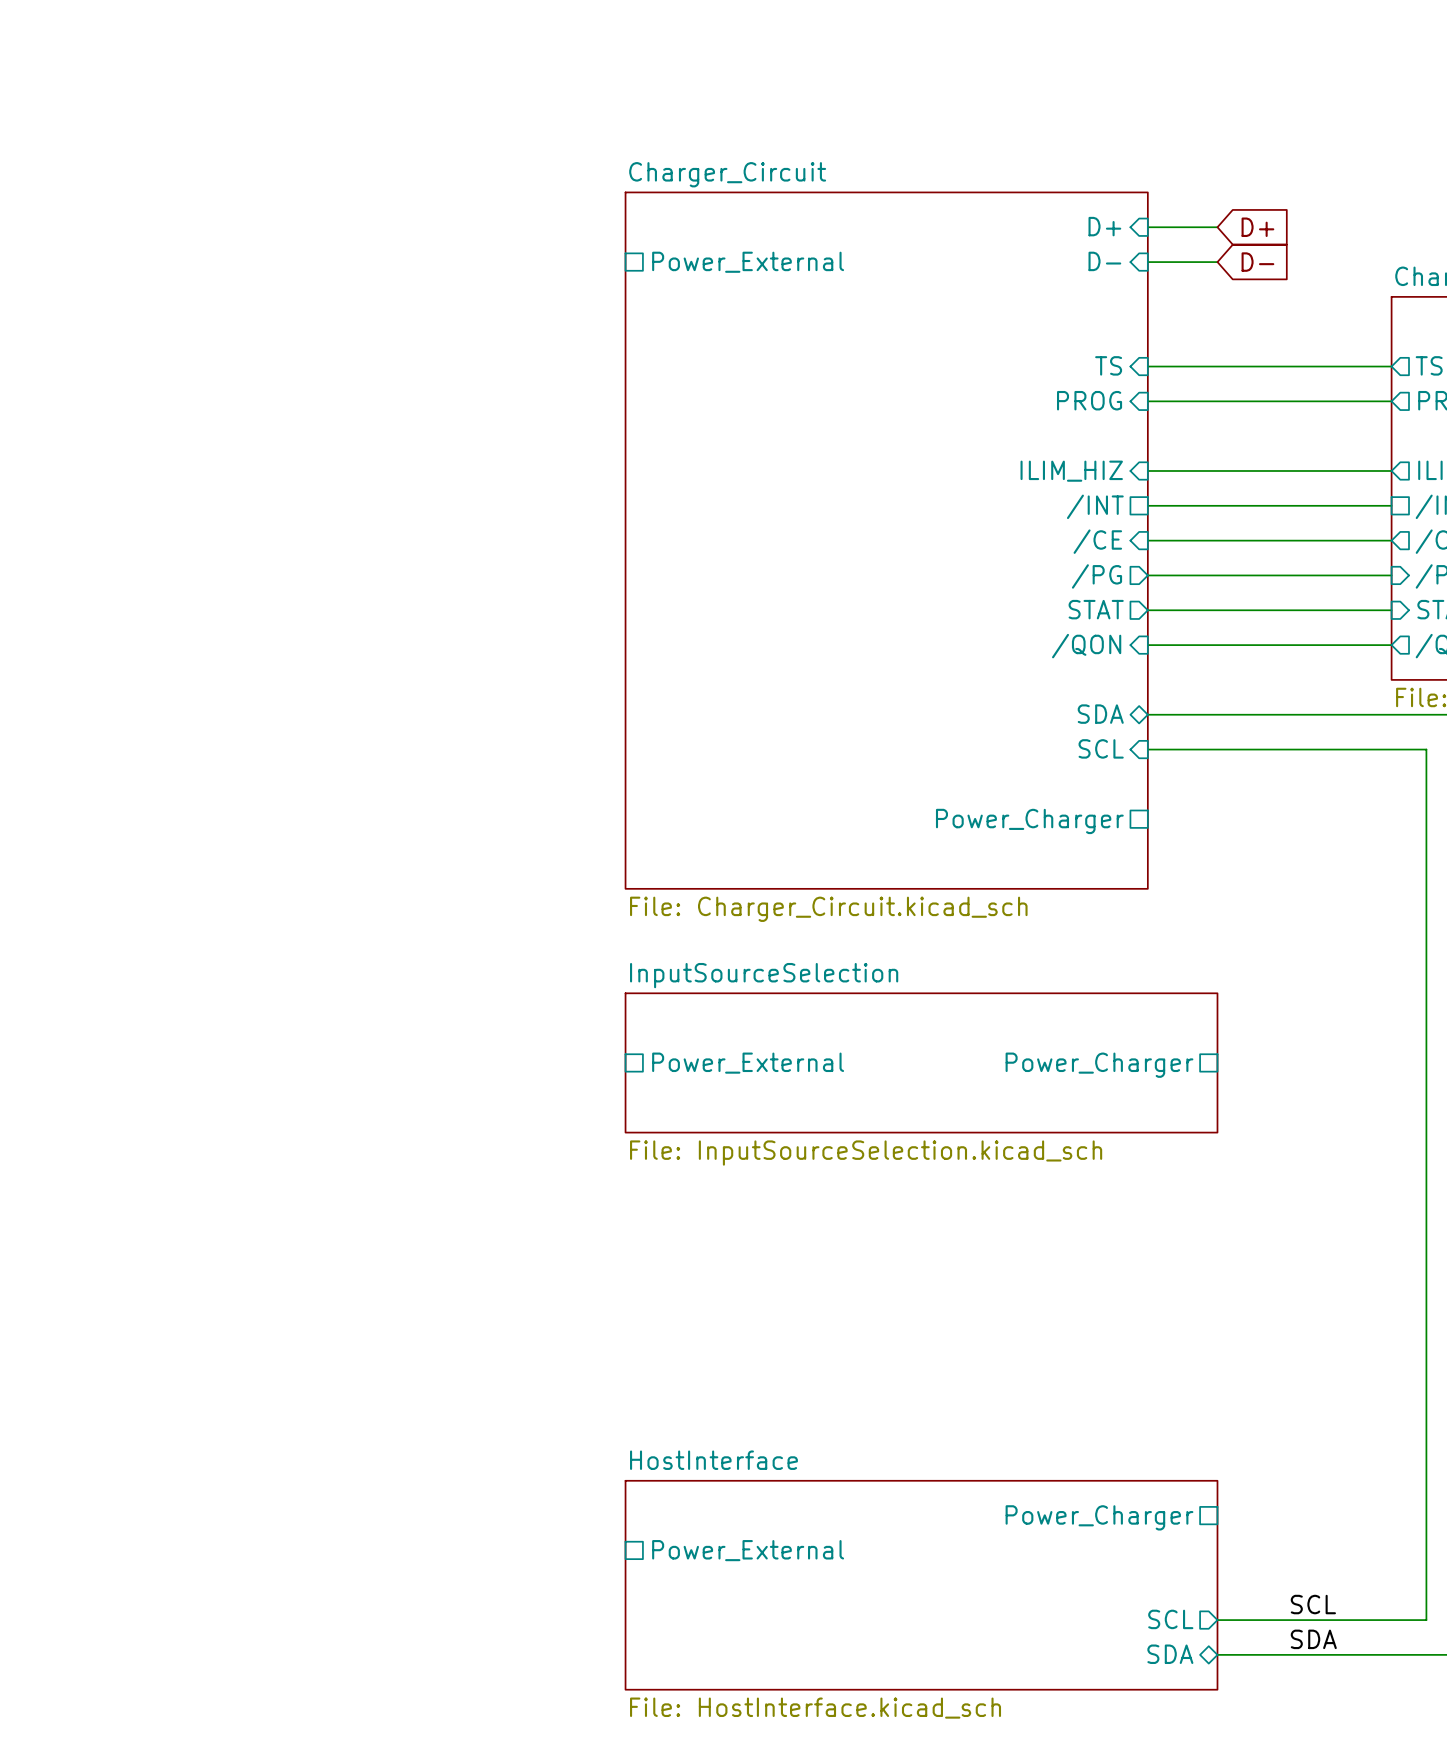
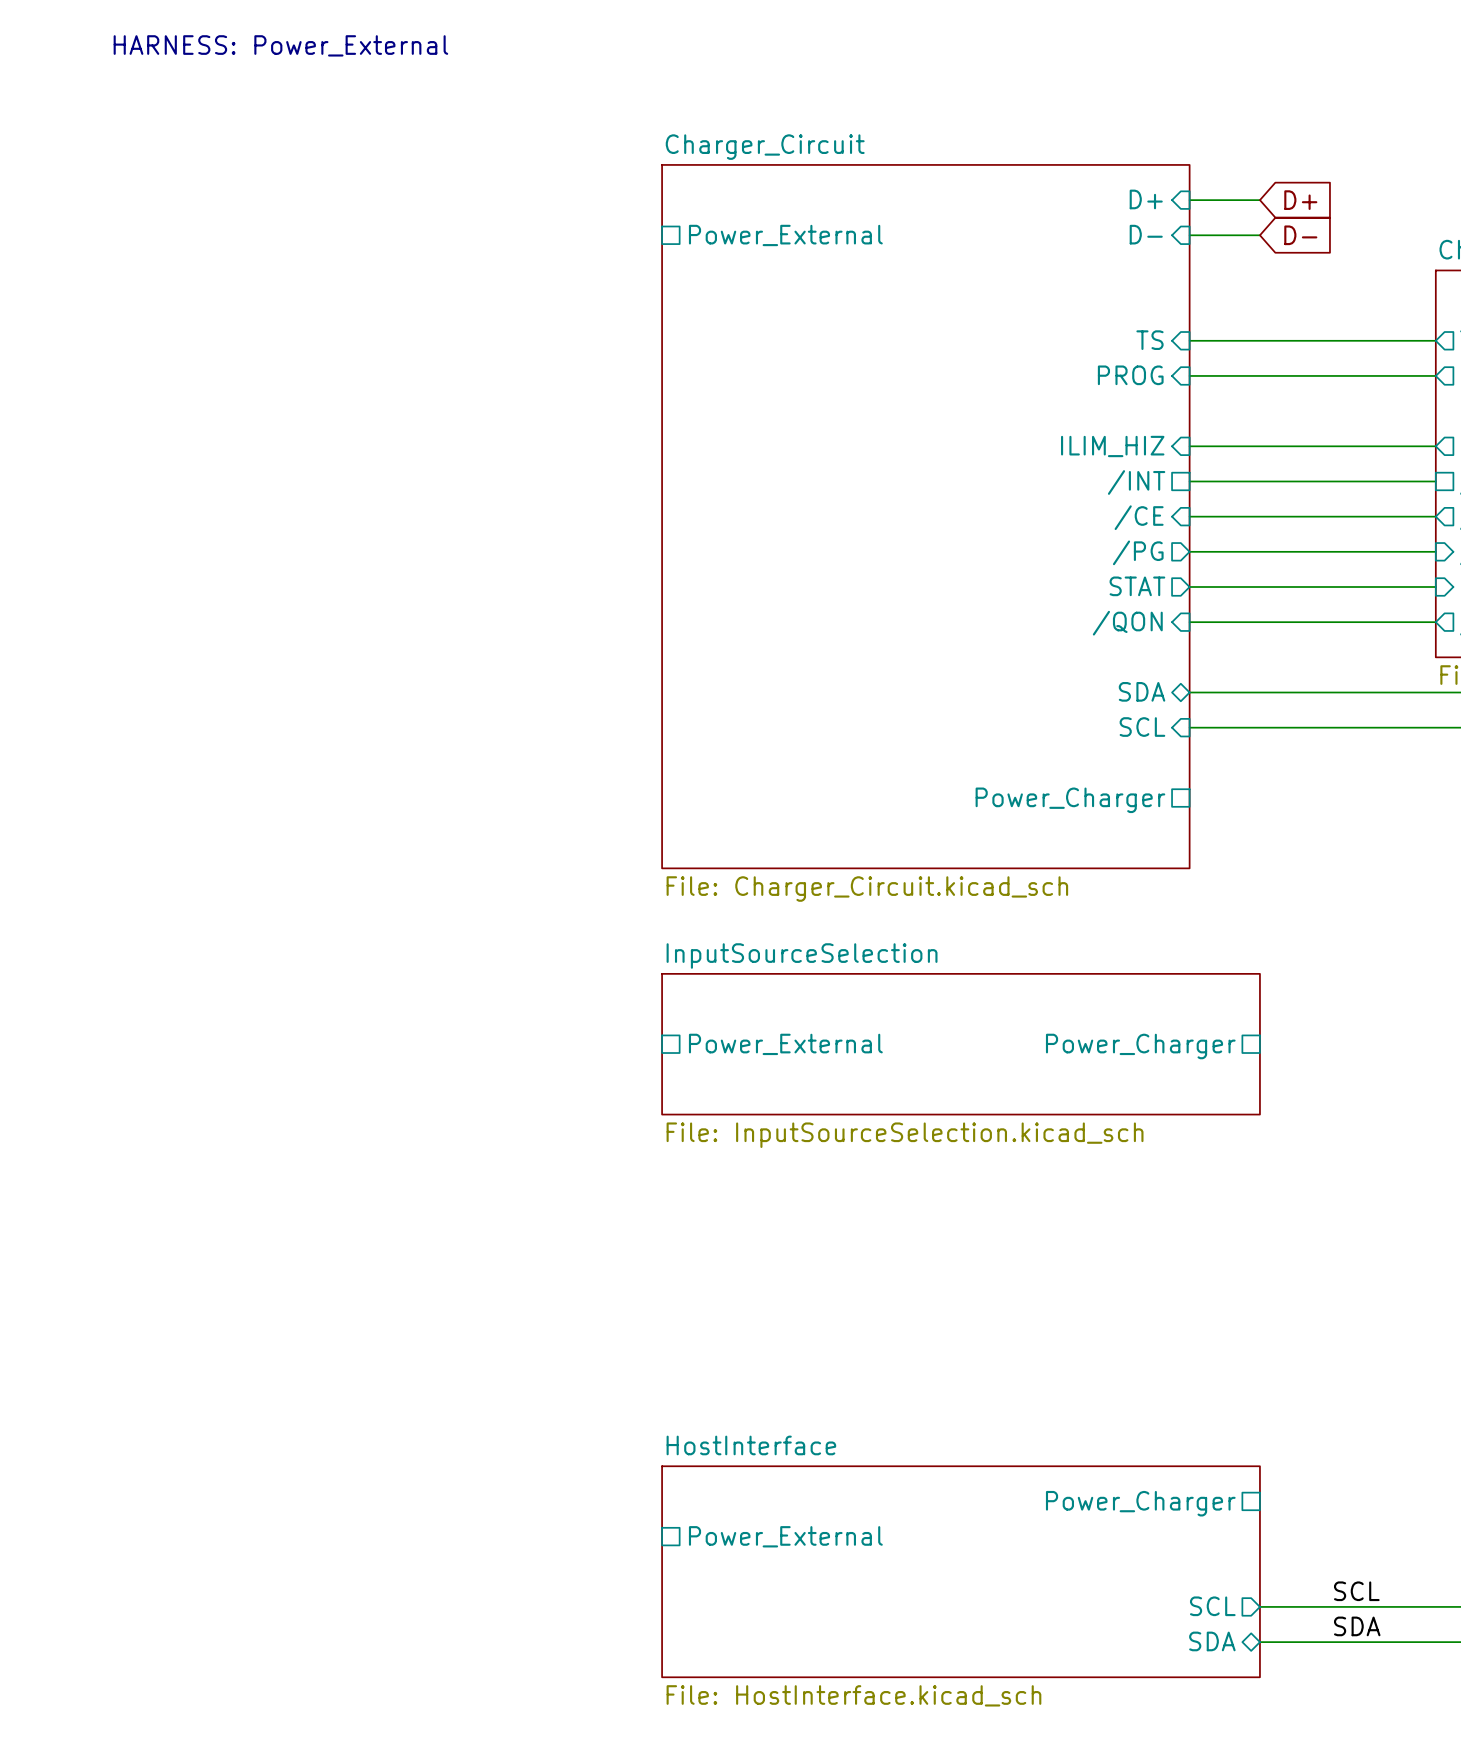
text: none -> HARNESS: Power_External (280, 45)

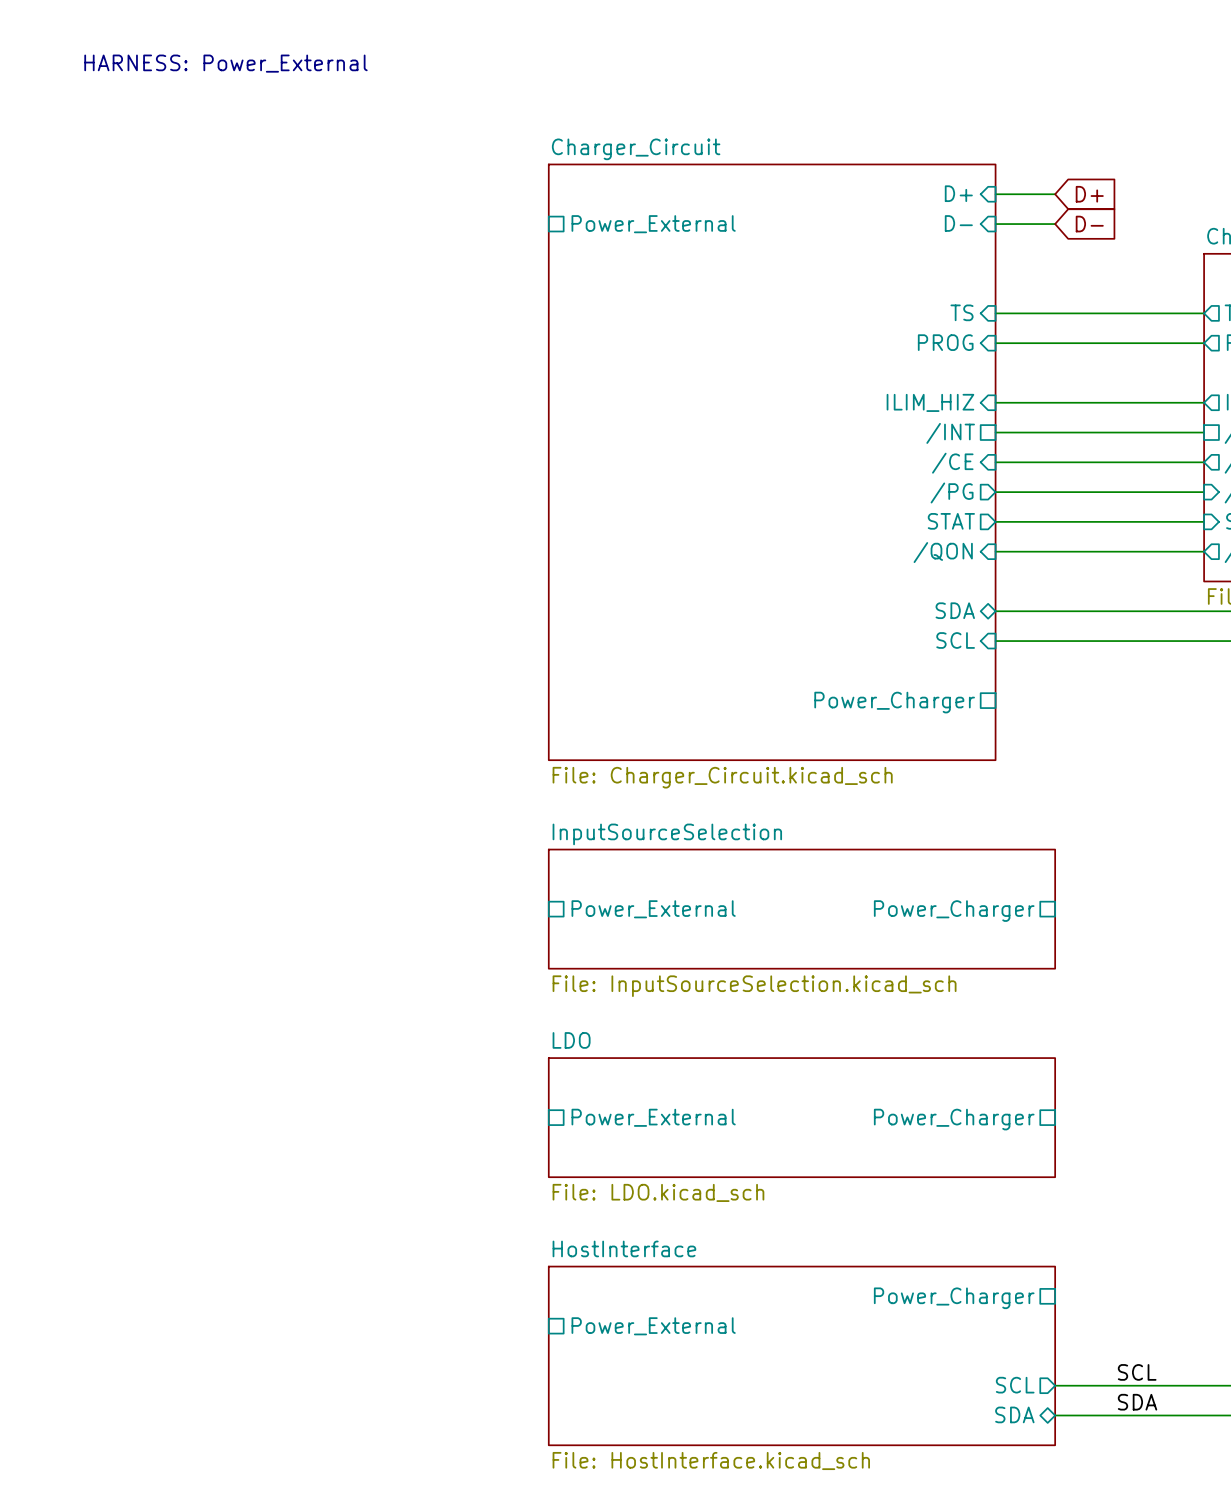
sheet pin: none -> Power_External (653, 1117)
sheet LDO: none -> File: LDO.kicad_sch (801, 1117)
sheet pin: none -> Power_Charger (954, 1119)

